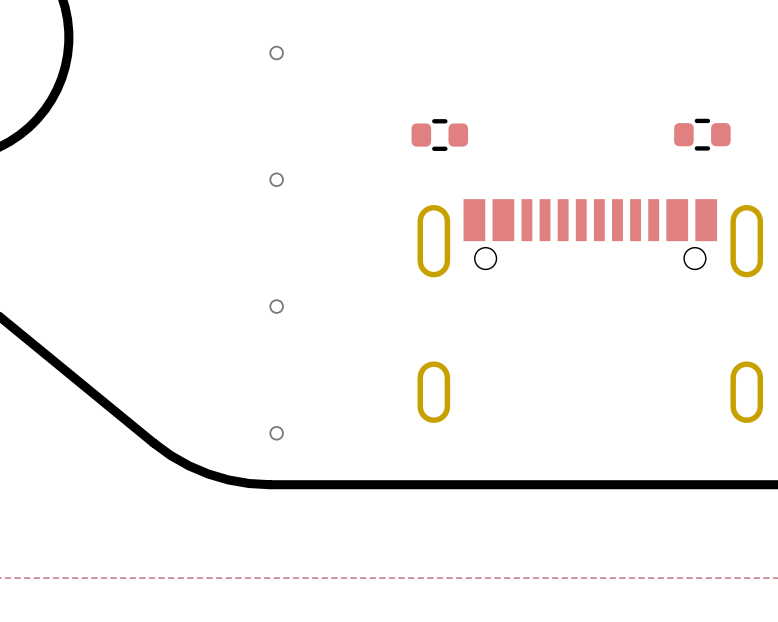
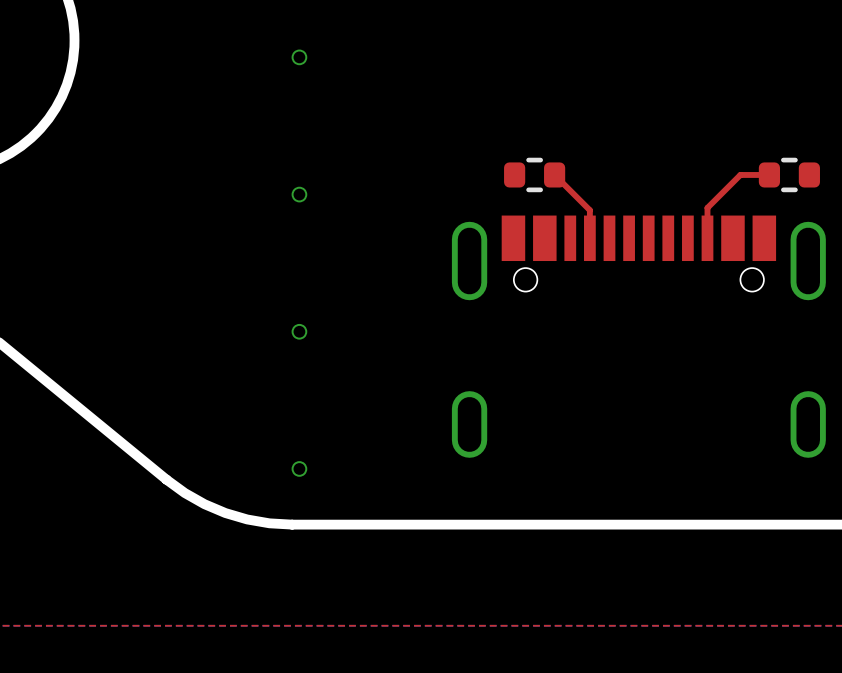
part position: (702, 134) -> (789, 174)
part position: (439, 135) -> (534, 174)
top track: none -> (554, 174) (589, 210) (589, 238)
top track: none -> (769, 174) (740, 174) (707, 207) (707, 238)

